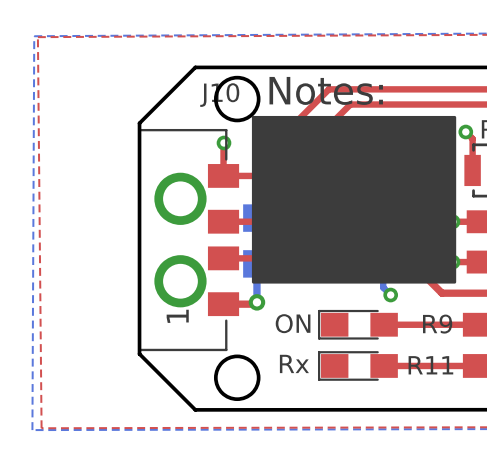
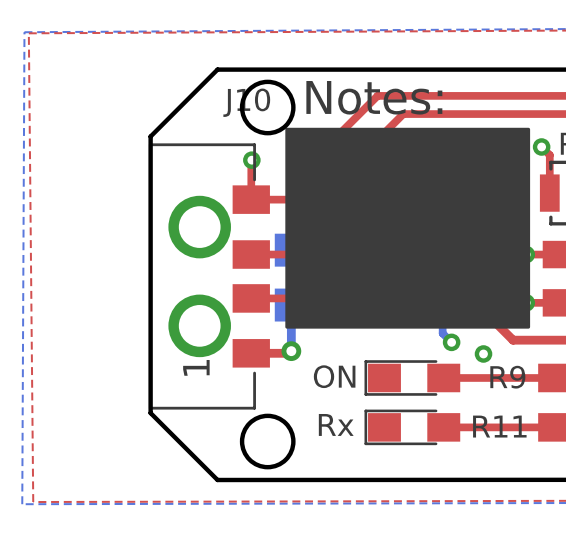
via: none -> (483, 353)

